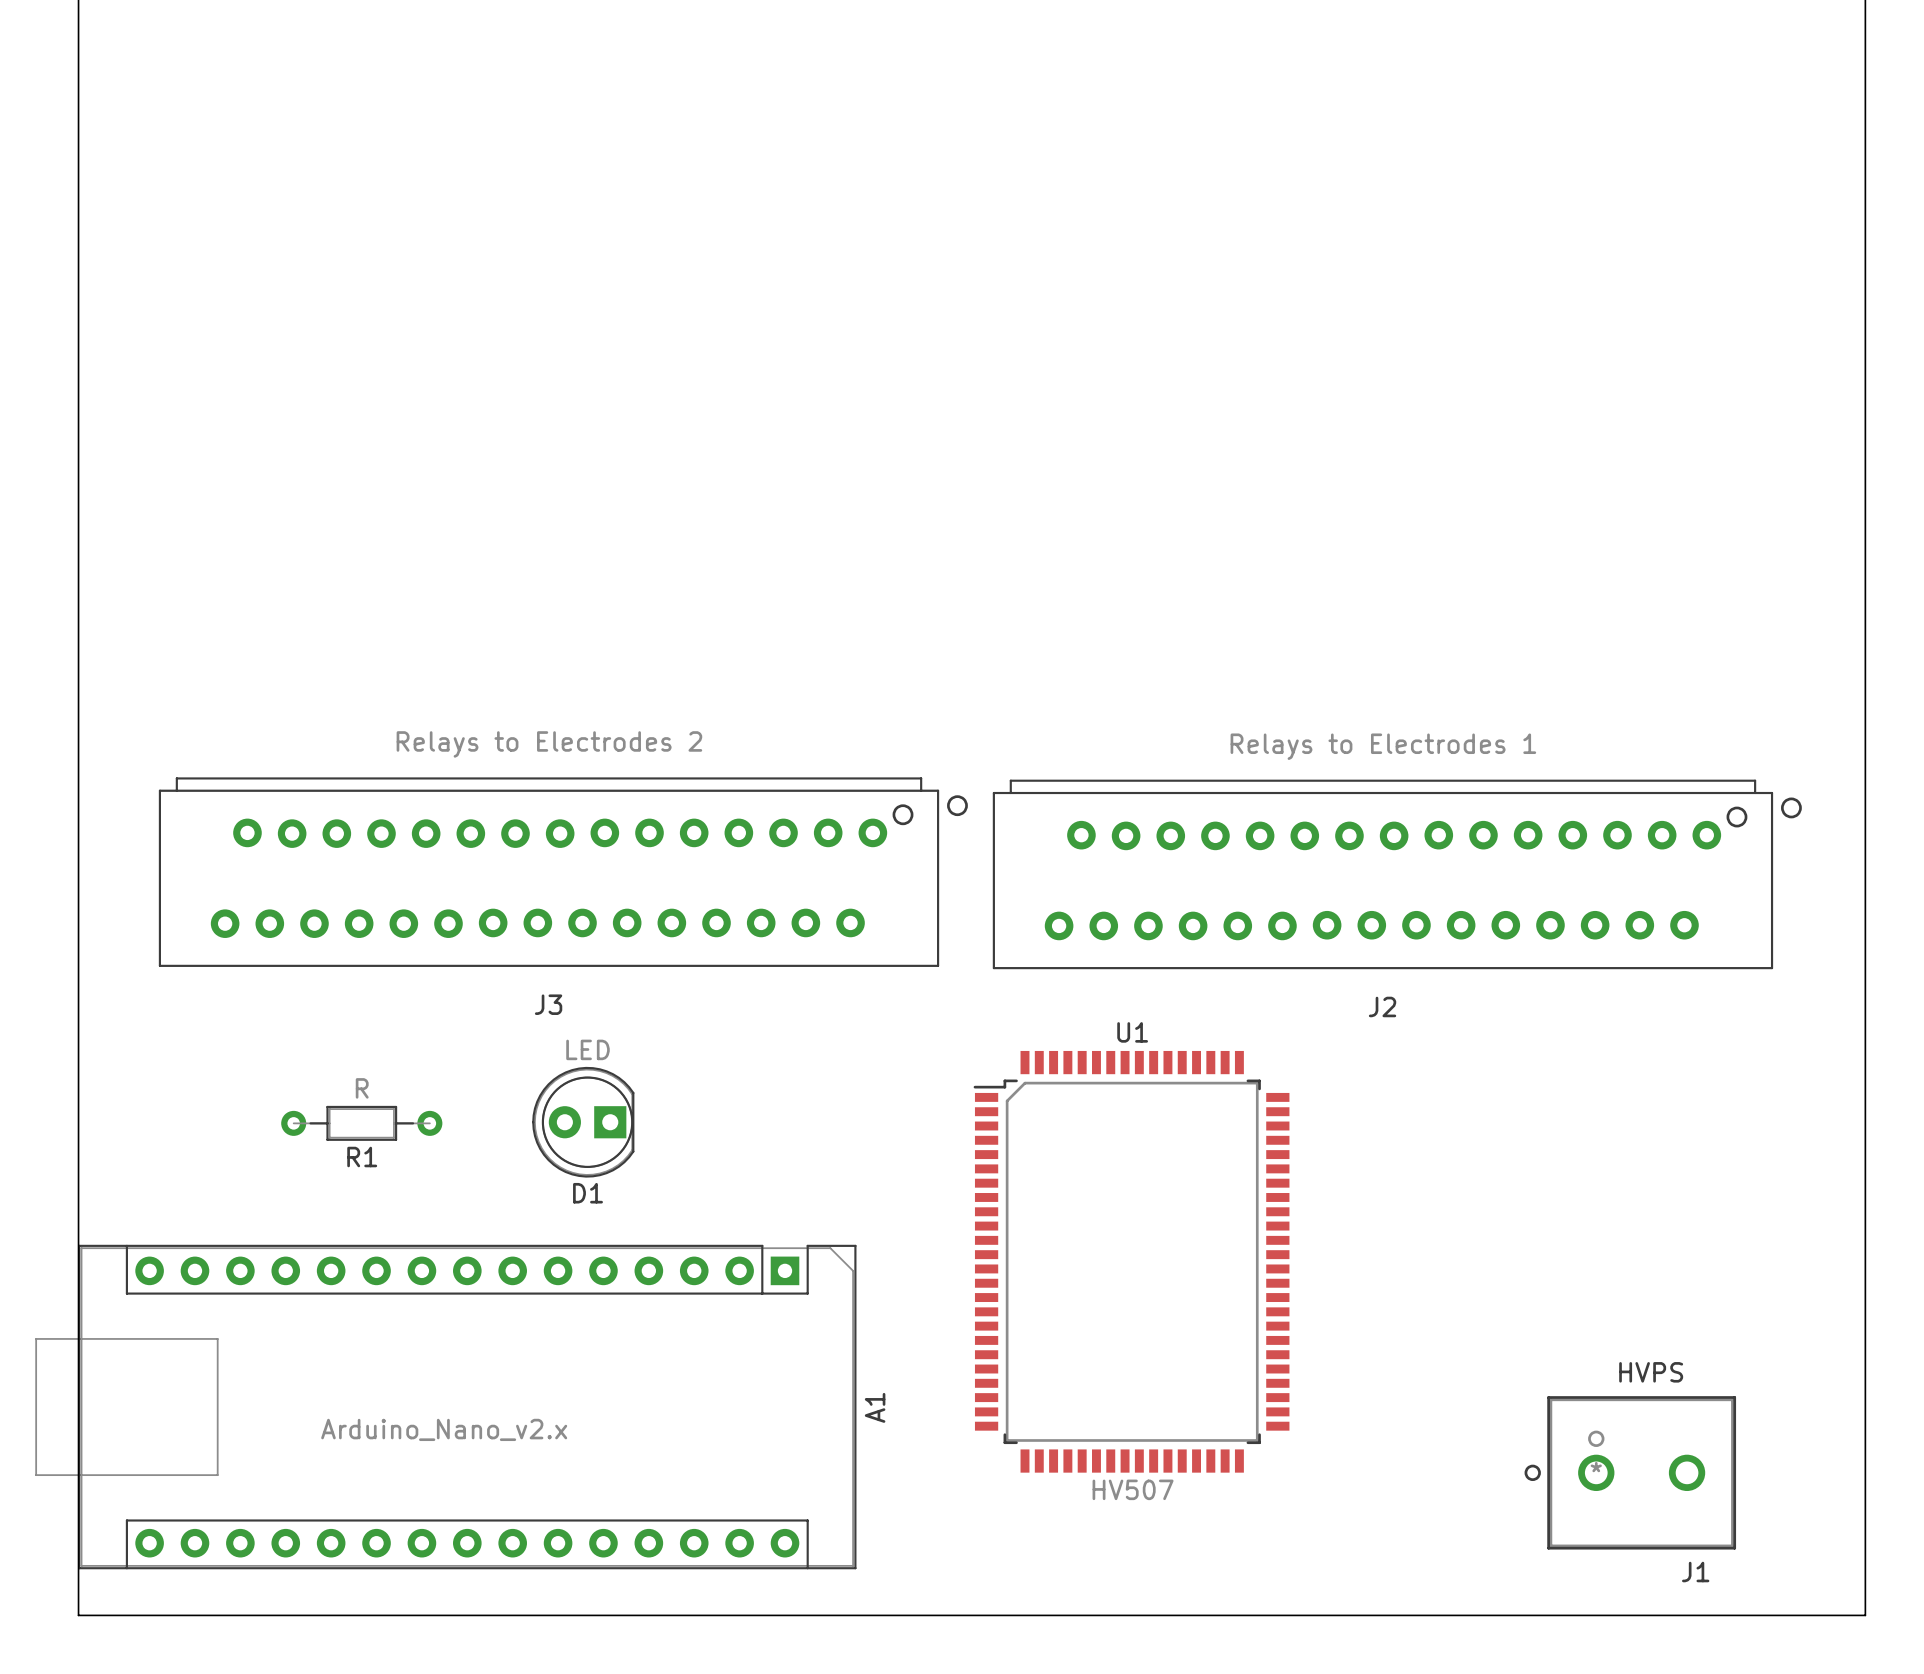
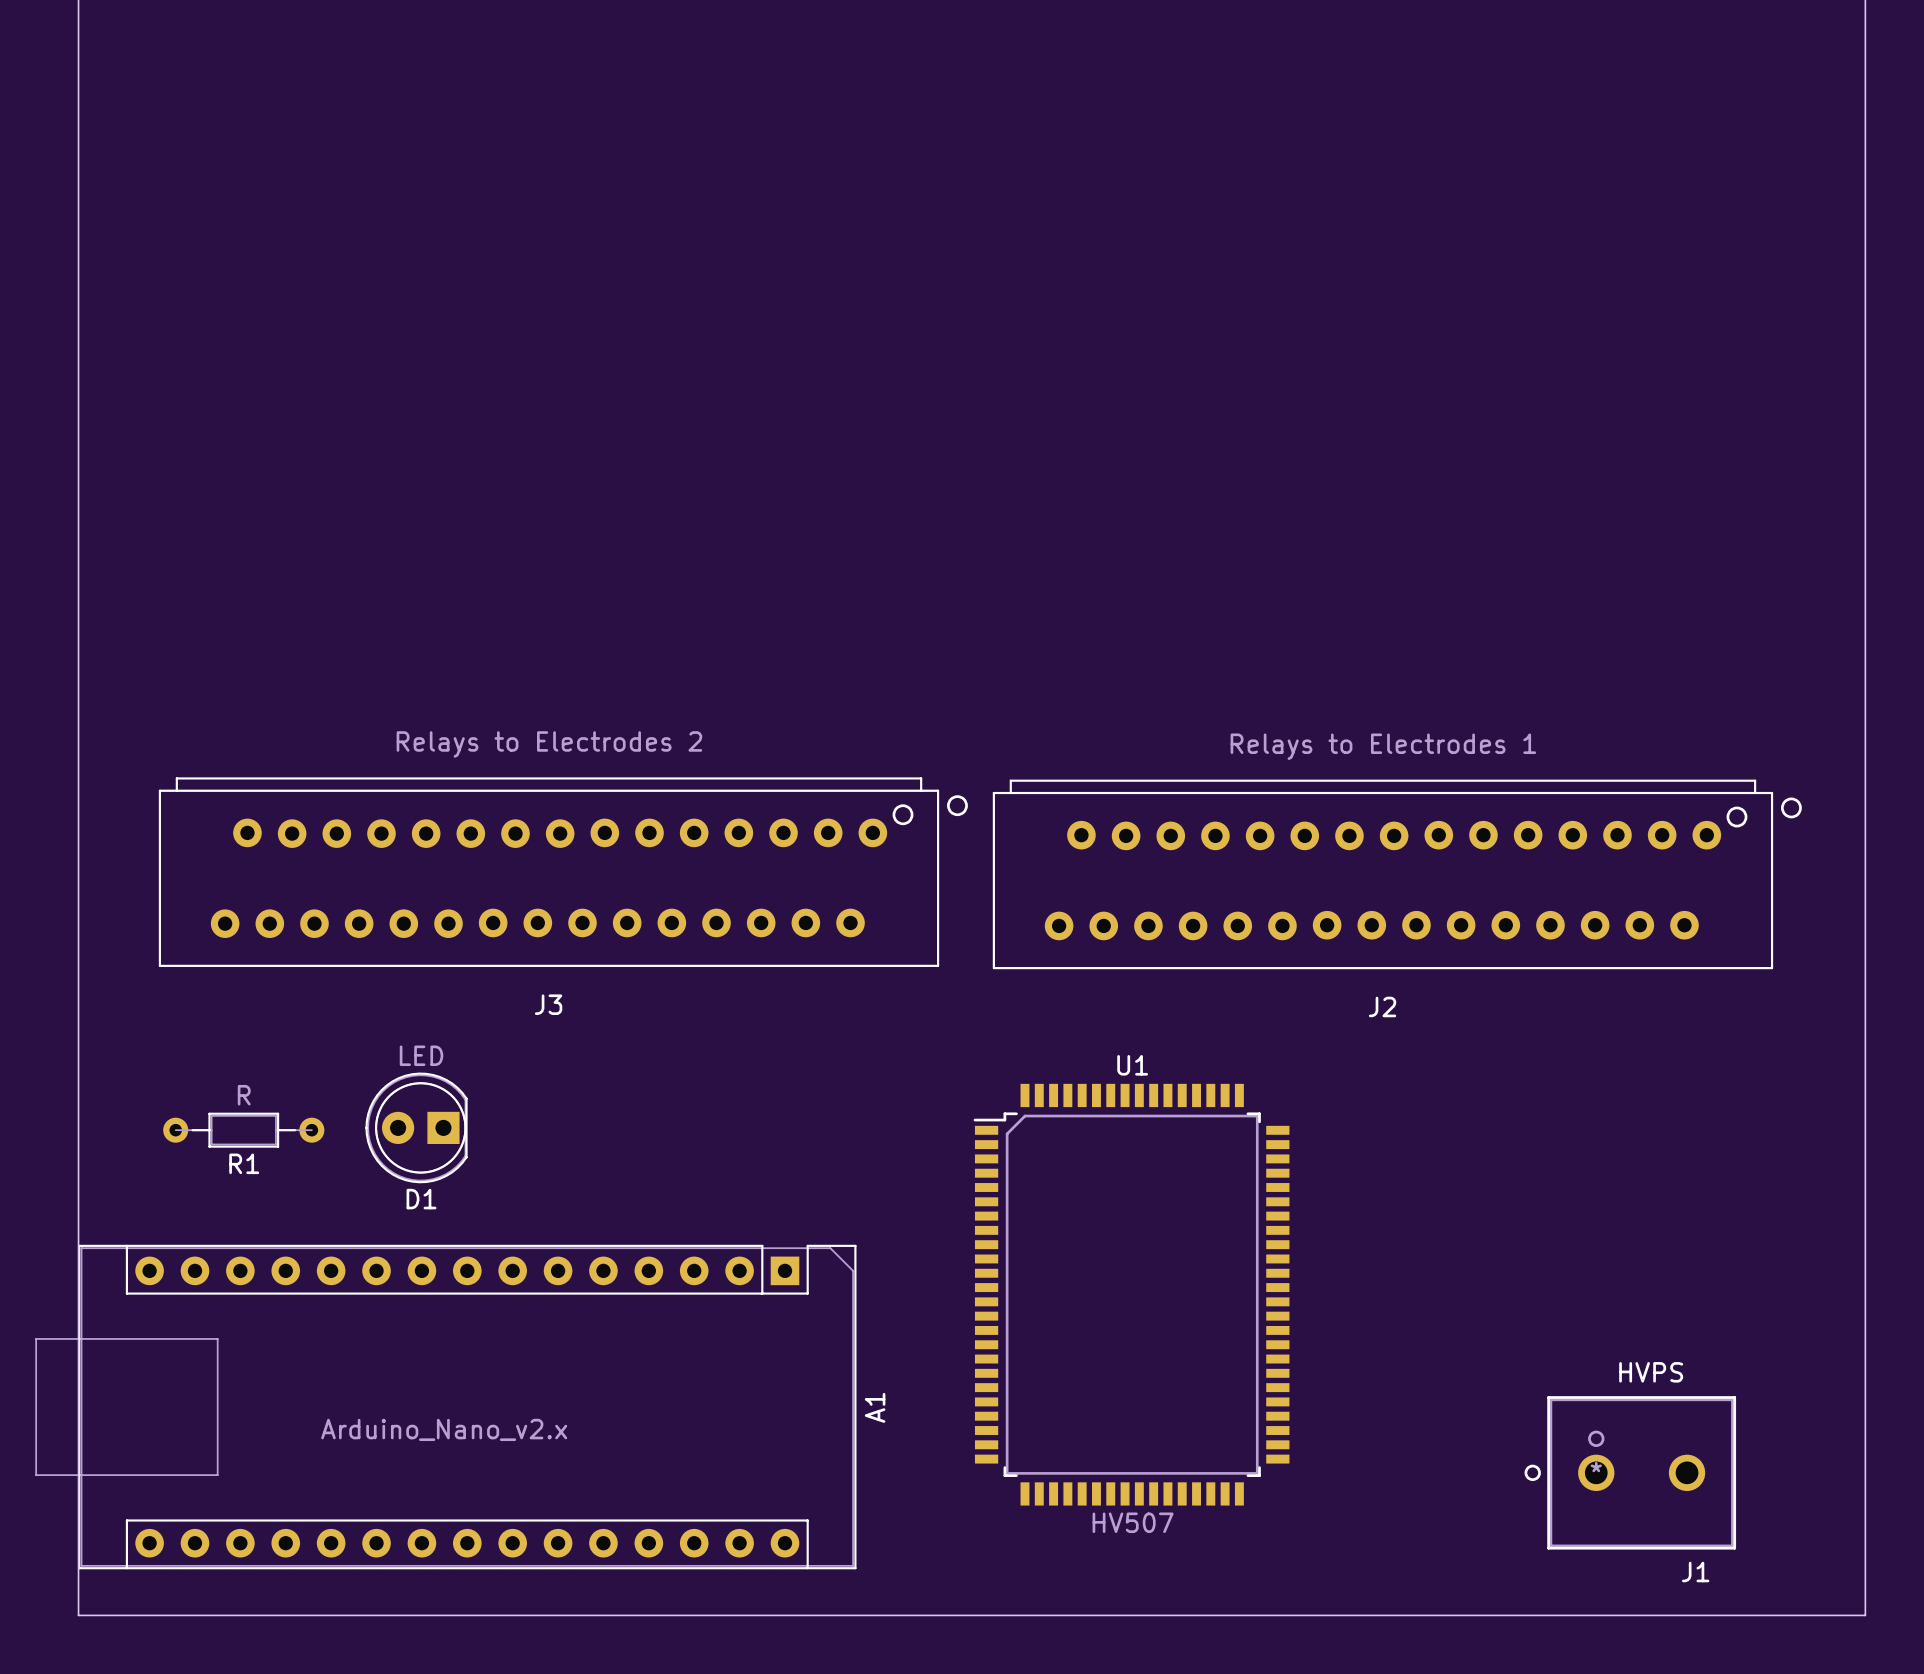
D1 position: (583, 1122) -> (416, 1127)
R1 position: (361, 1123) -> (243, 1130)
U1 position: (1131, 1261) -> (1131, 1294)

